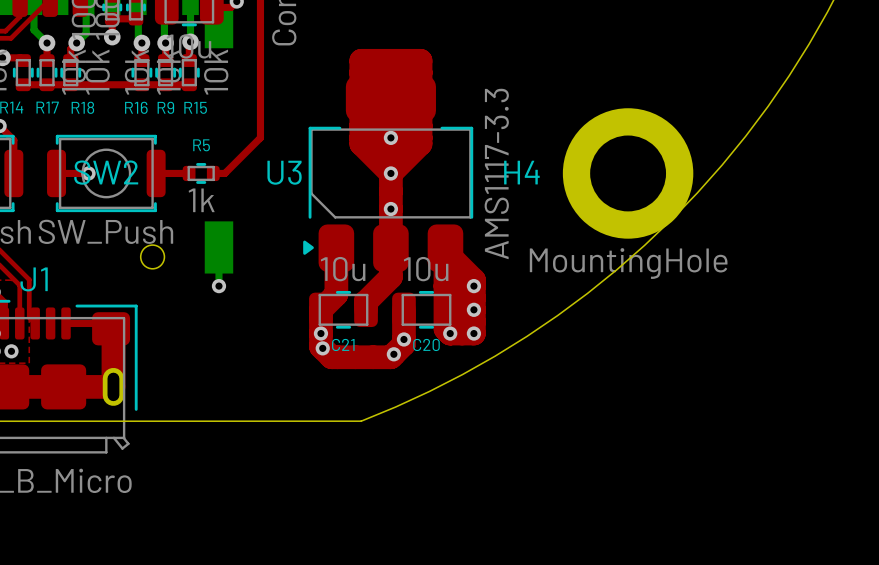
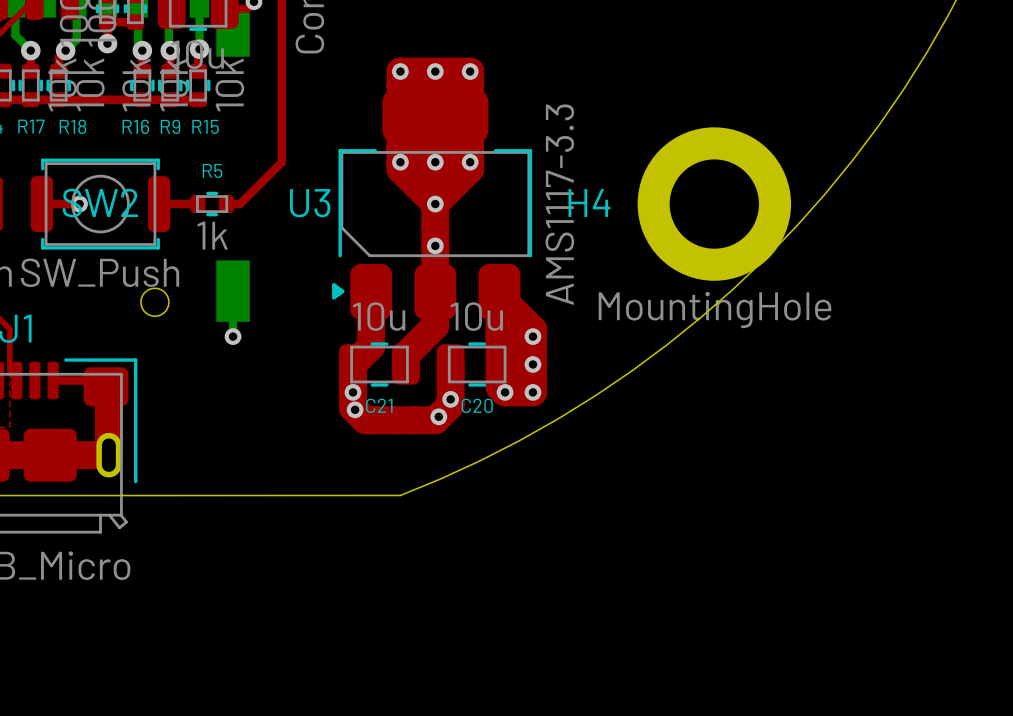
via: none -> (400, 71)
via: none -> (435, 71)
via: none -> (470, 71)
via: none -> (400, 162)
via: none -> (470, 162)

